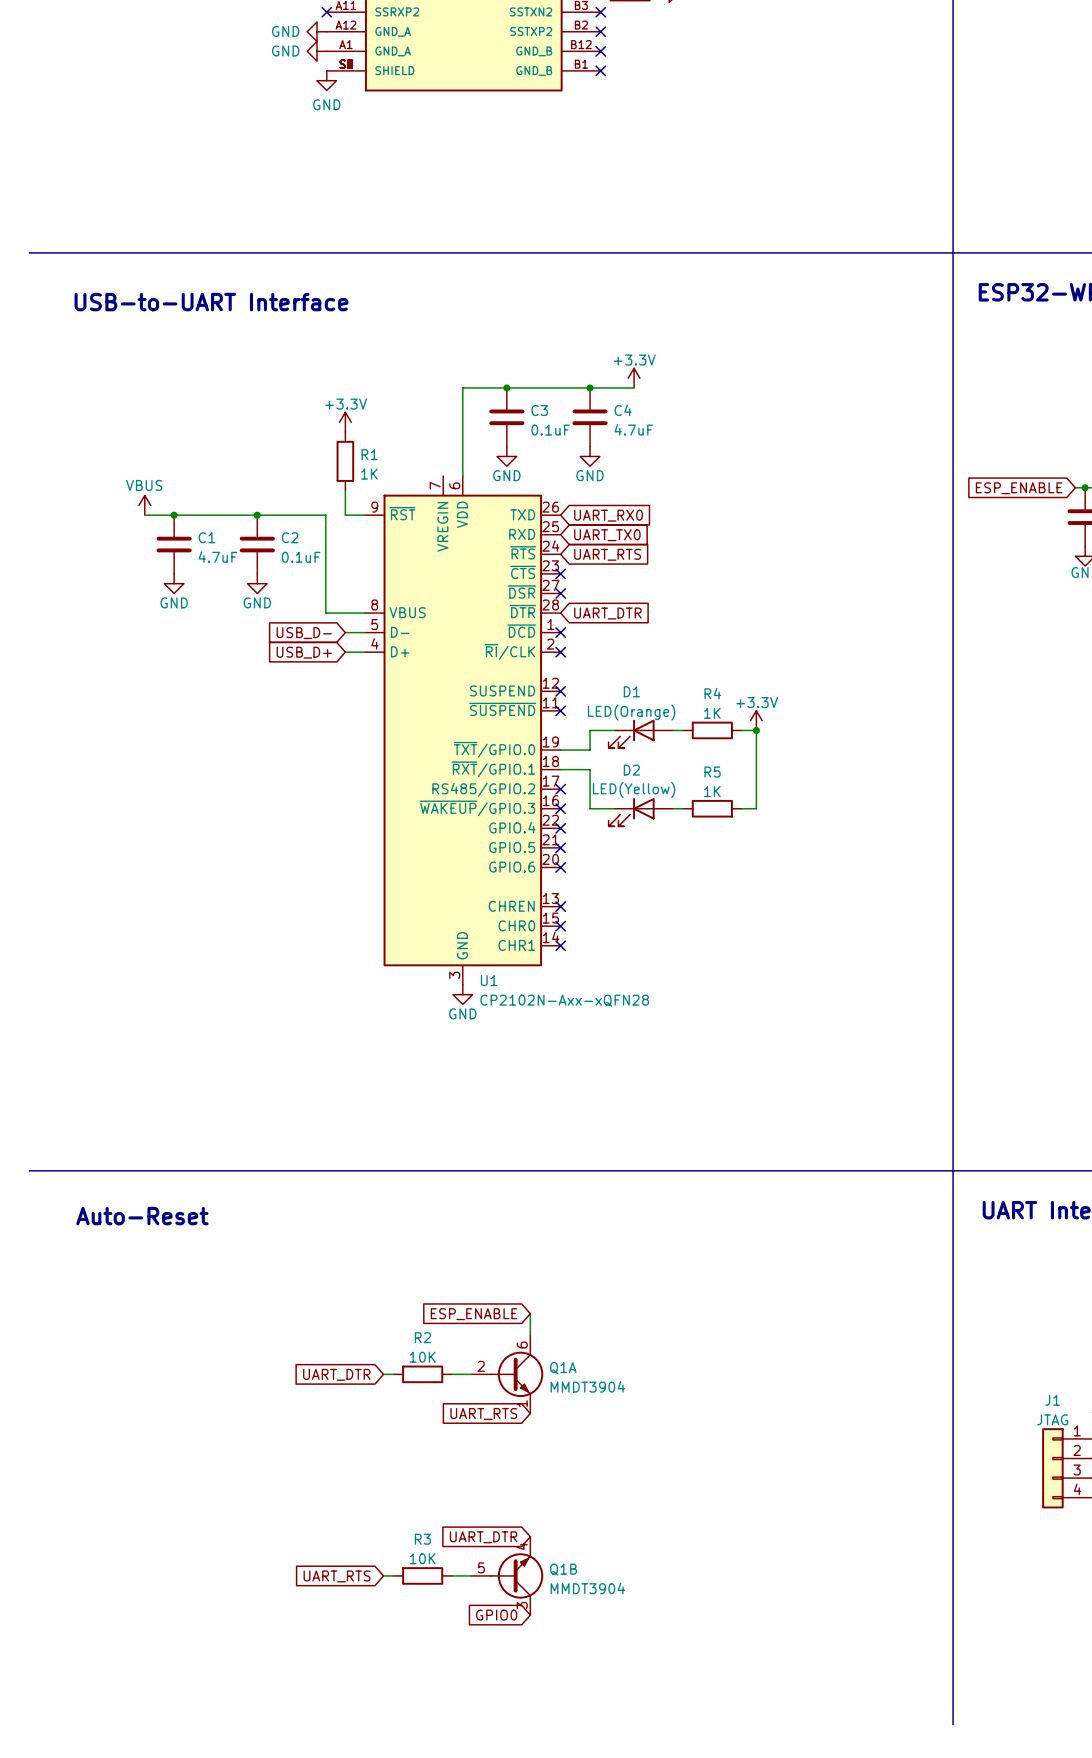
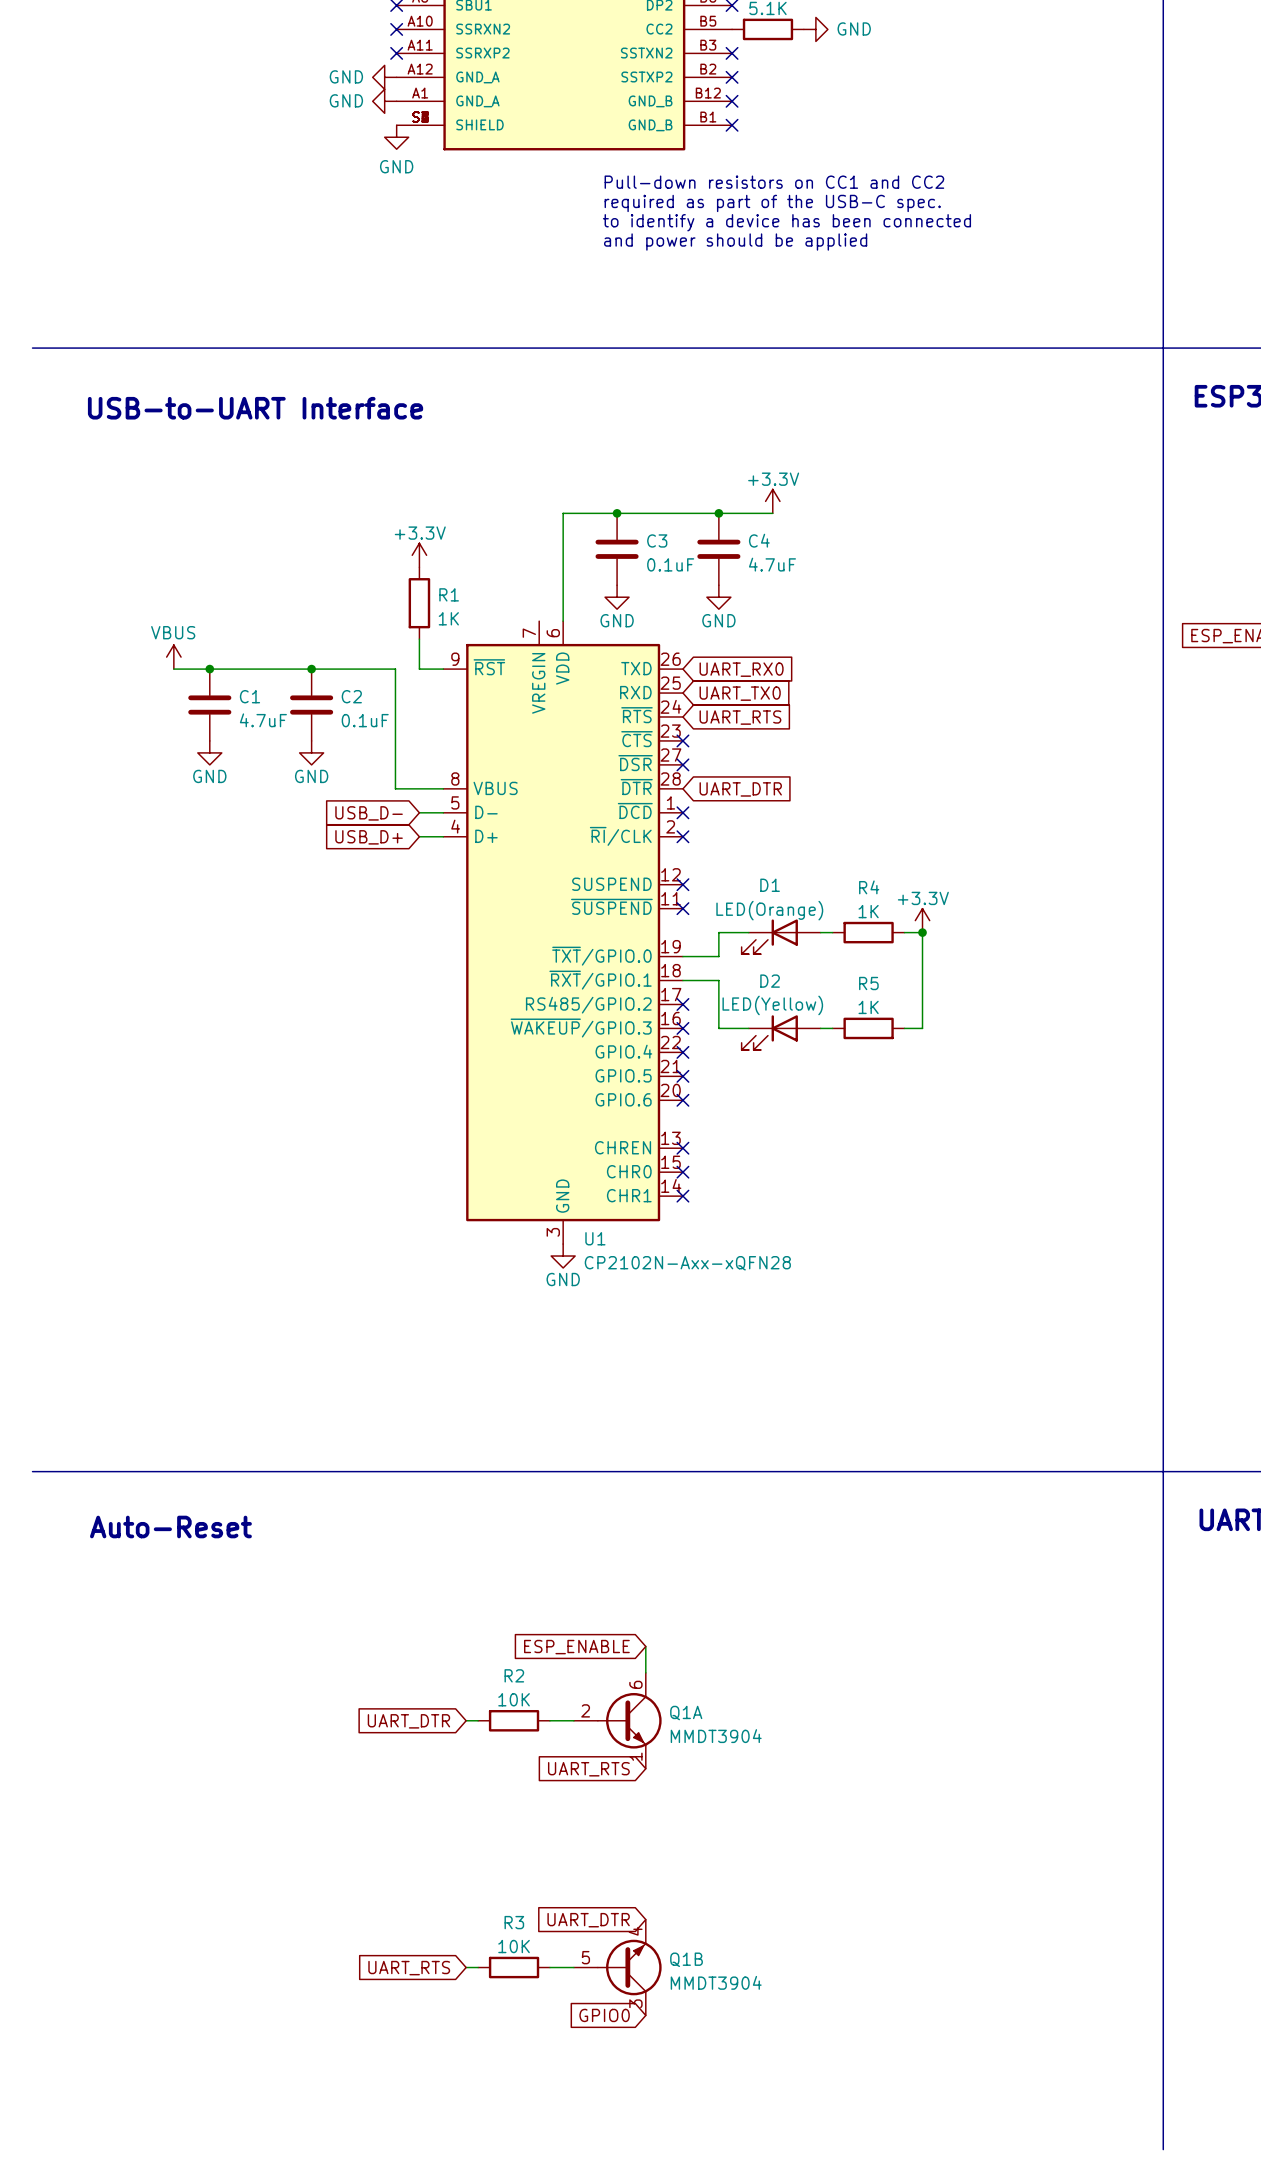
text: none -> Pull-down resistors on CC1 and CC2 (774, 182)
text: none -> required as part of the USB-C spec. (772, 203)
text: none -> to identify a device has been connected (786, 222)
text: none -> and power should be applied (735, 242)

